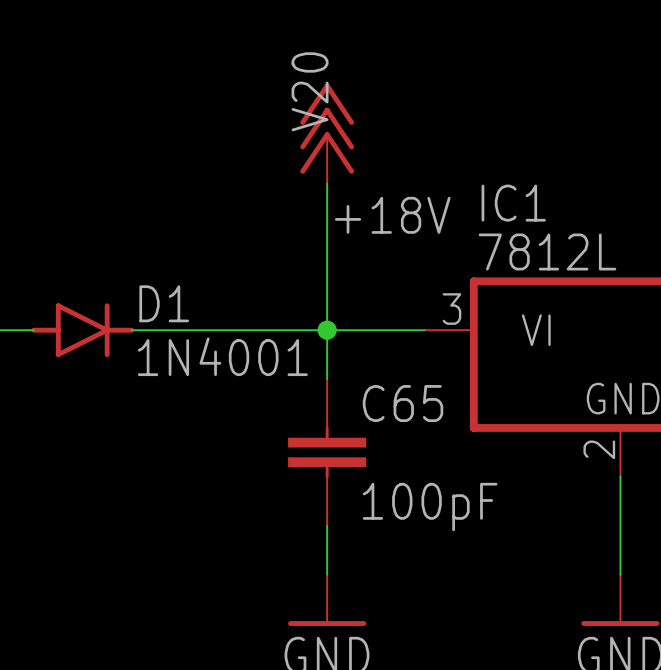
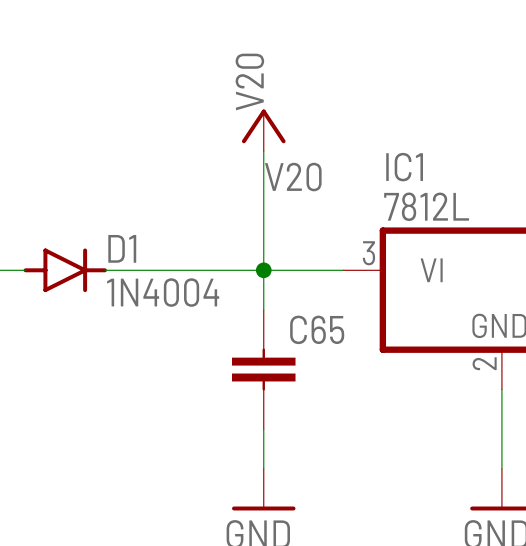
power symbol: V20 (327, 133) -> none
power symbol: none -> V20 (263, 130)
label: +18V (392, 215) -> V20 (293, 177)
D1 value: 1N4001 (222, 356) -> 1N4004 (163, 292)
C65 value: 100pF (430, 507) -> none

